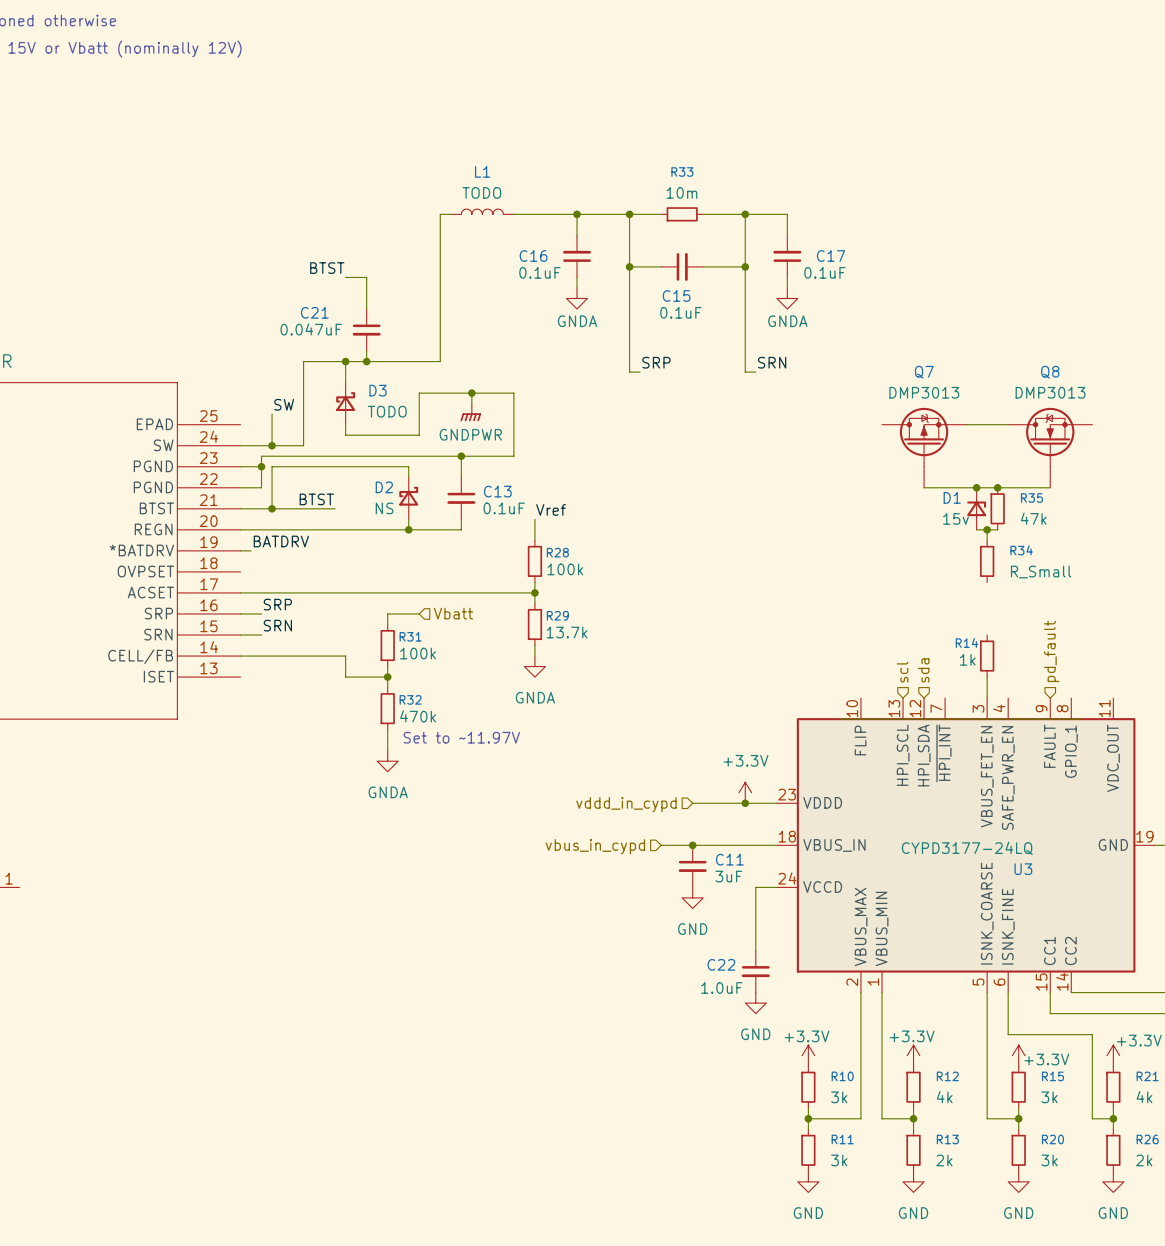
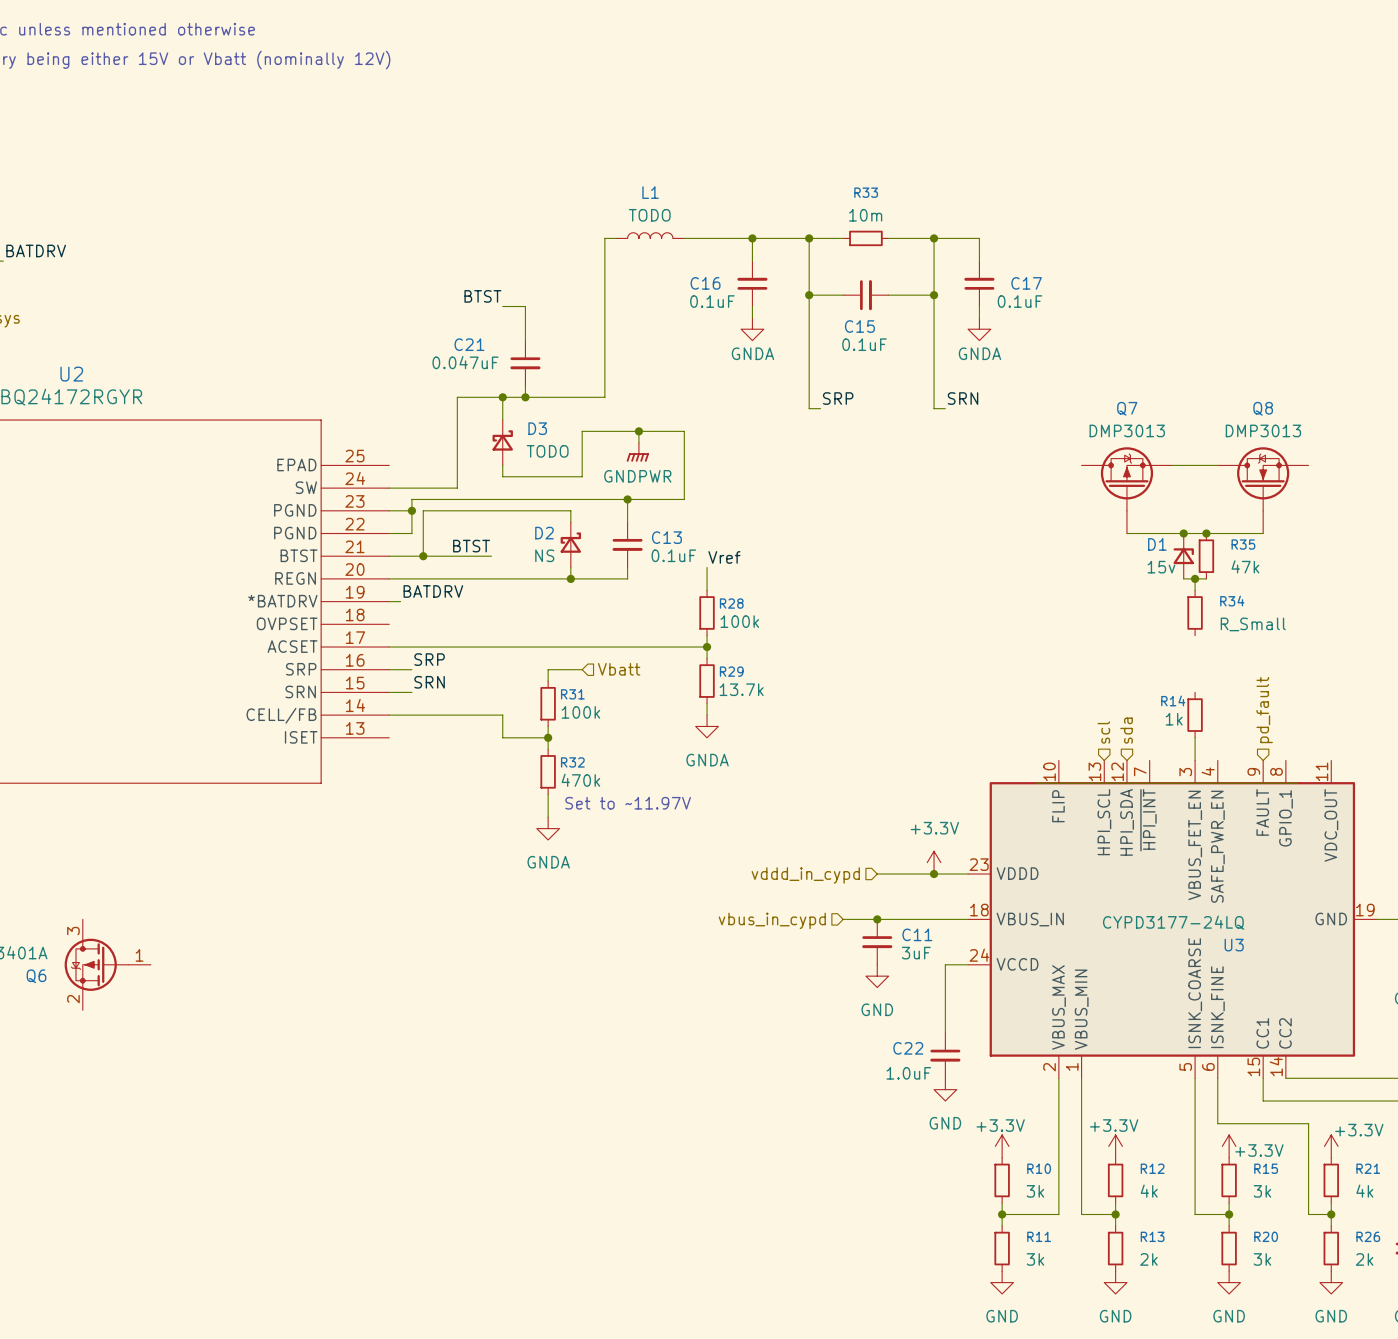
label: SW (284, 404) -> none
wire: (272, 414) (272, 445) -> none
junction: (272, 445) -> none

